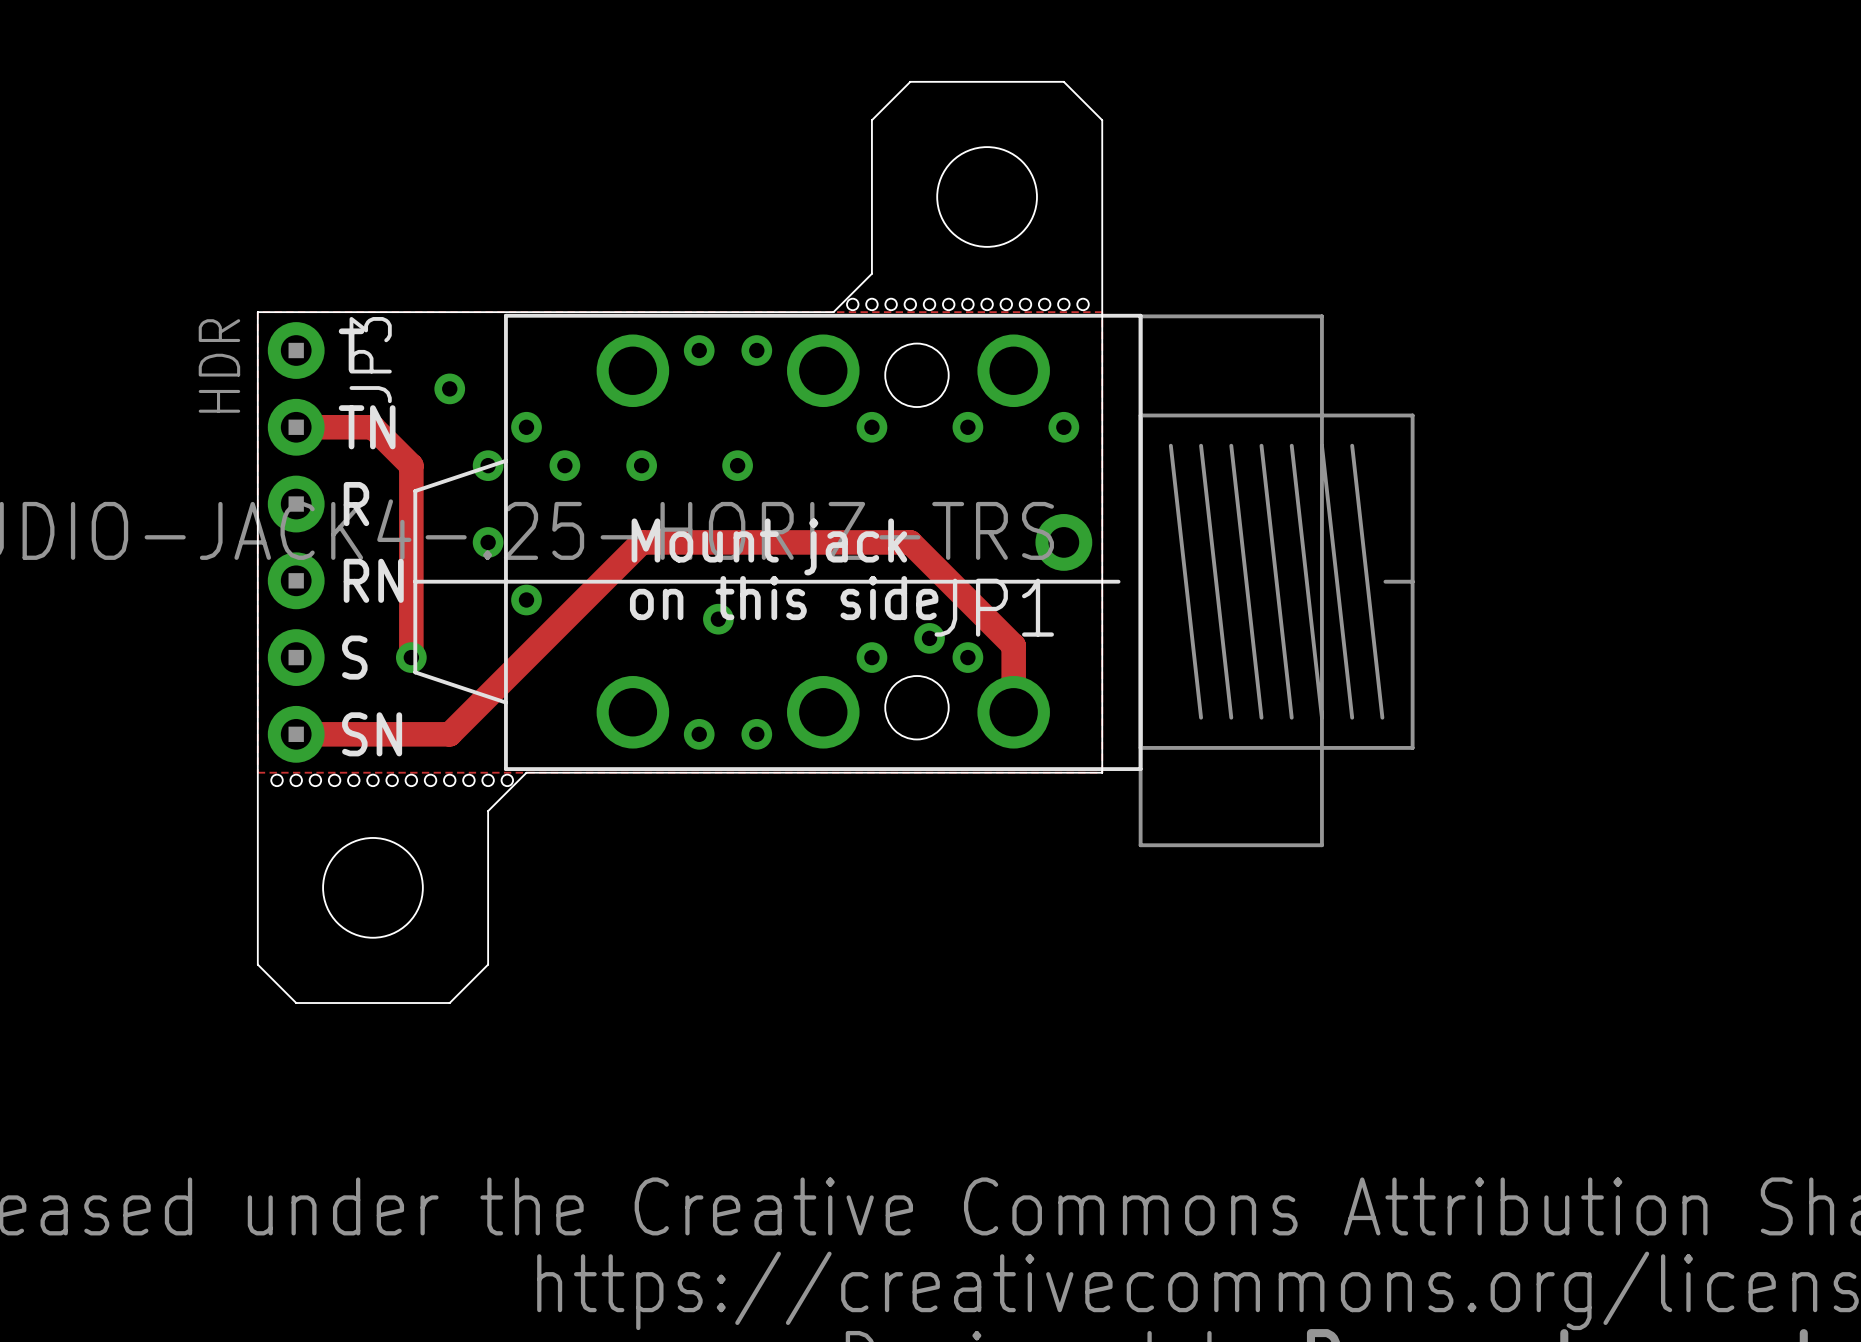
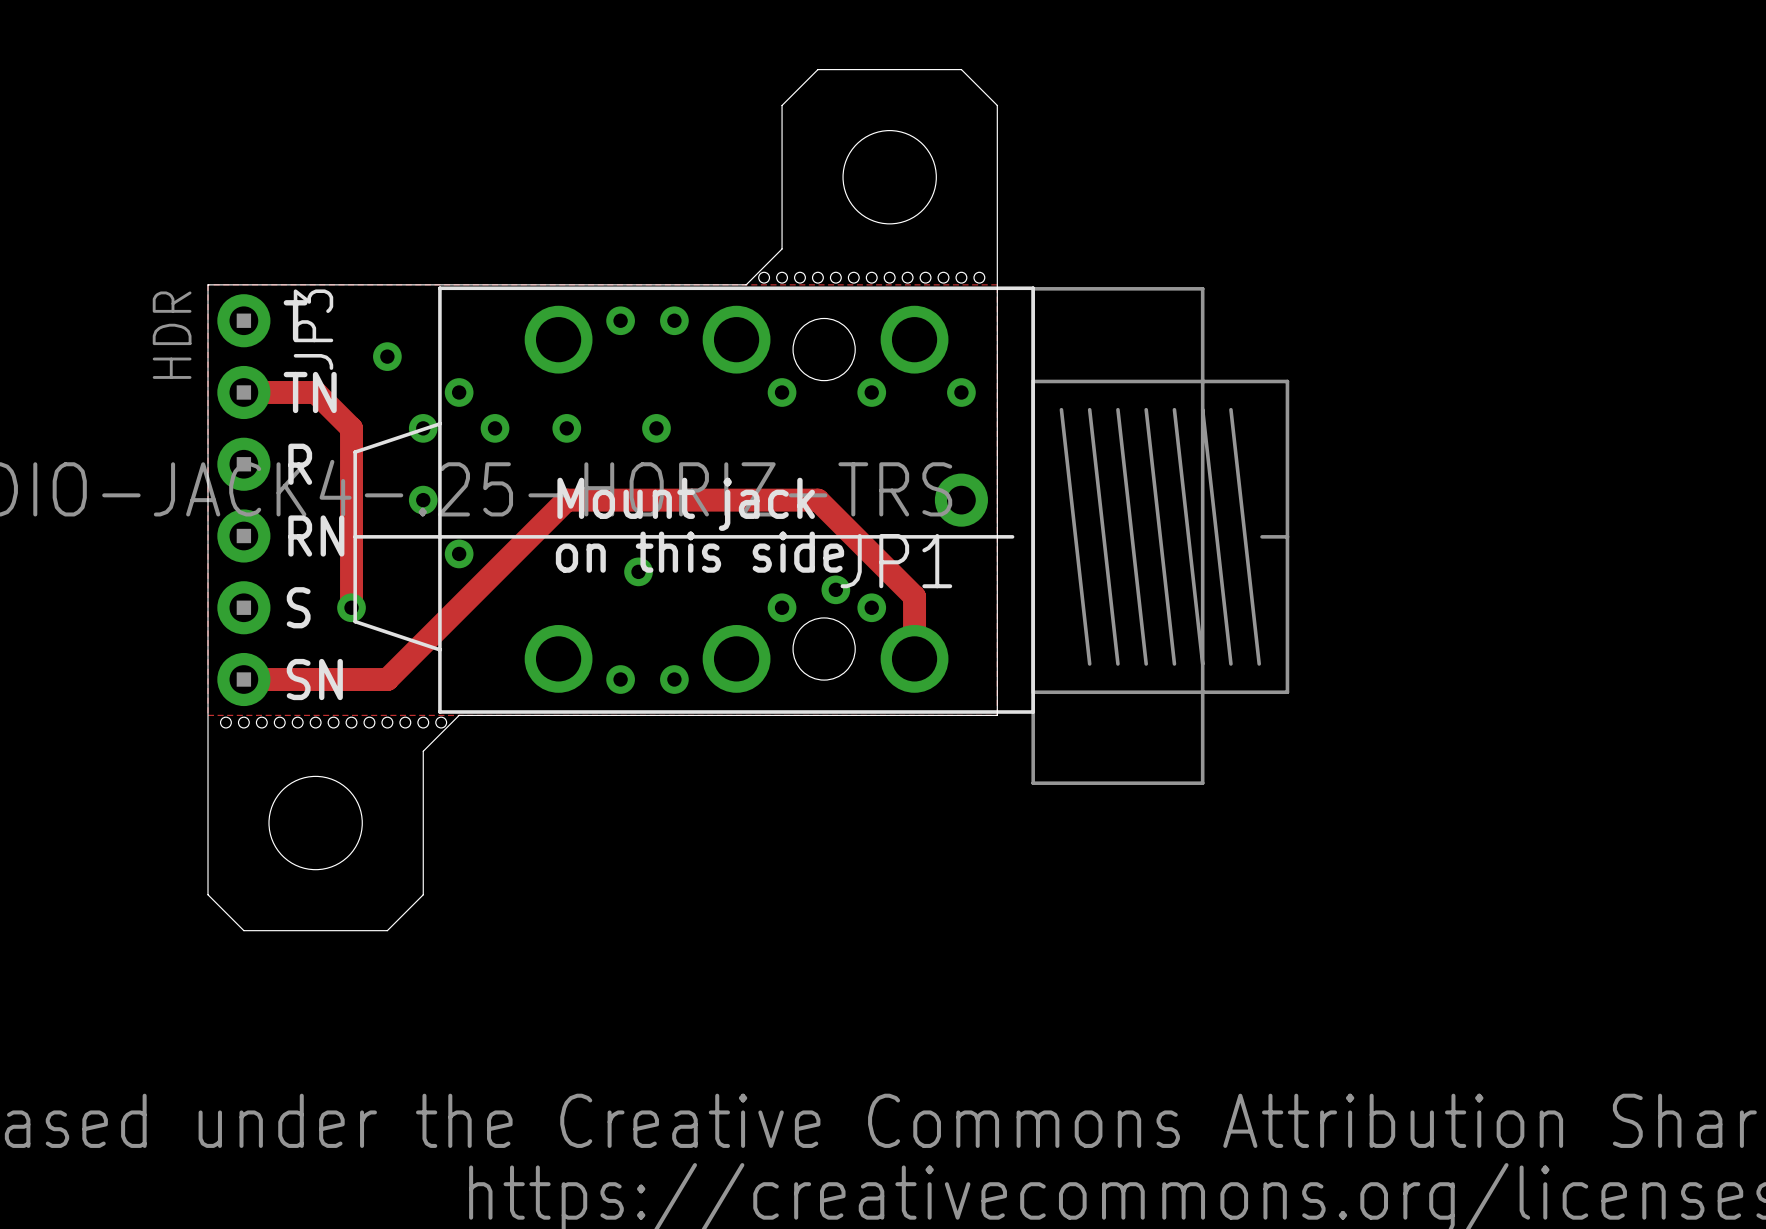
JP1 footprint: [413, 313, 1415, 848] -> [353, 286, 1290, 785]

